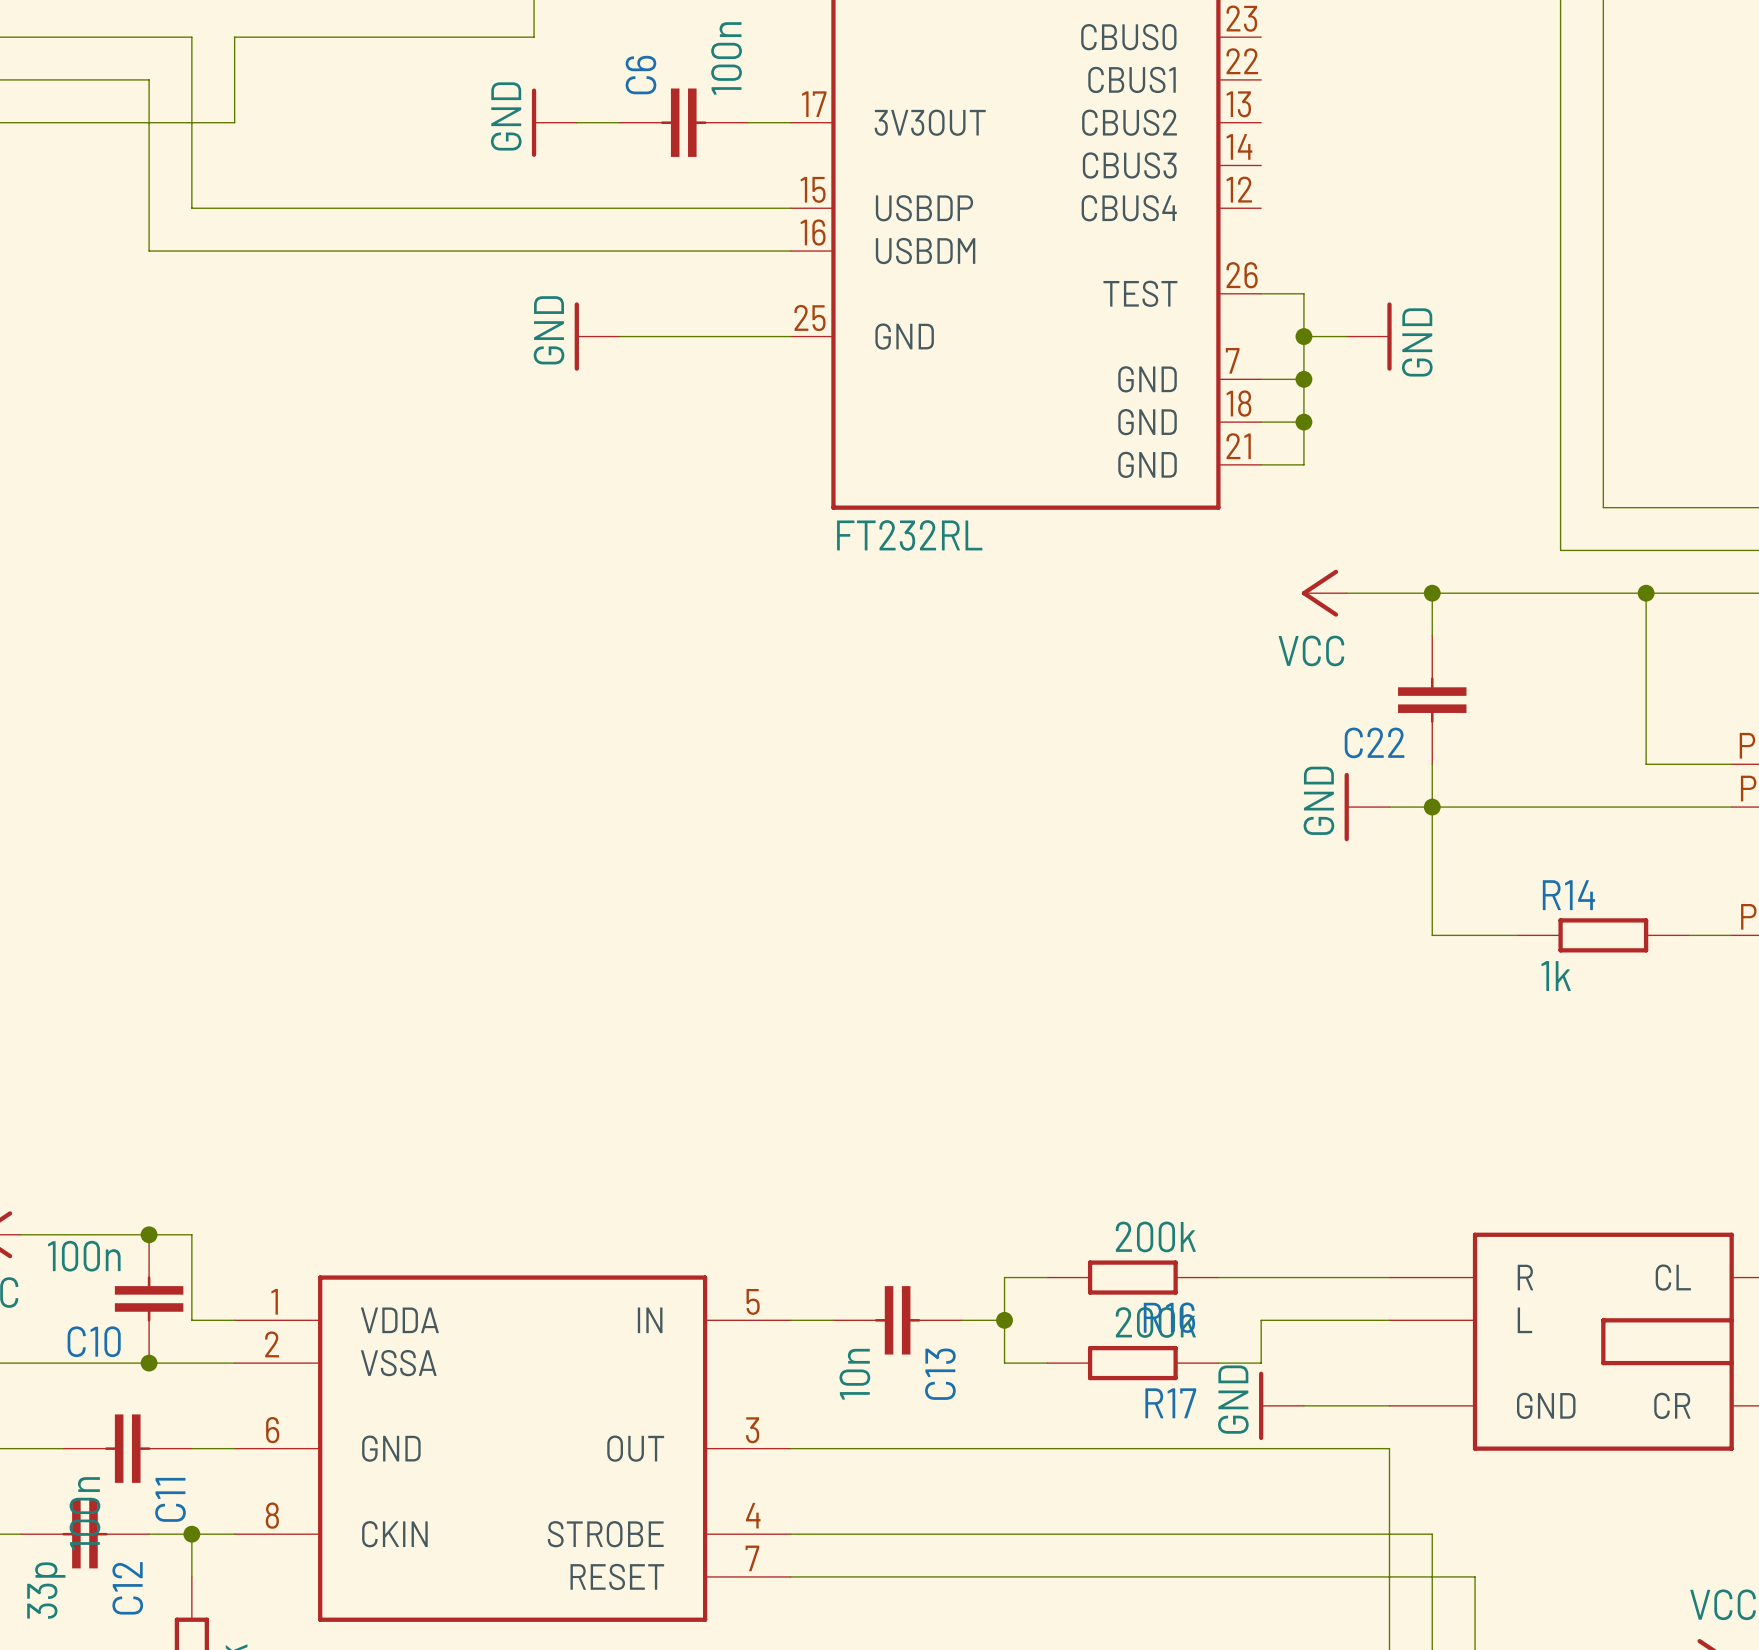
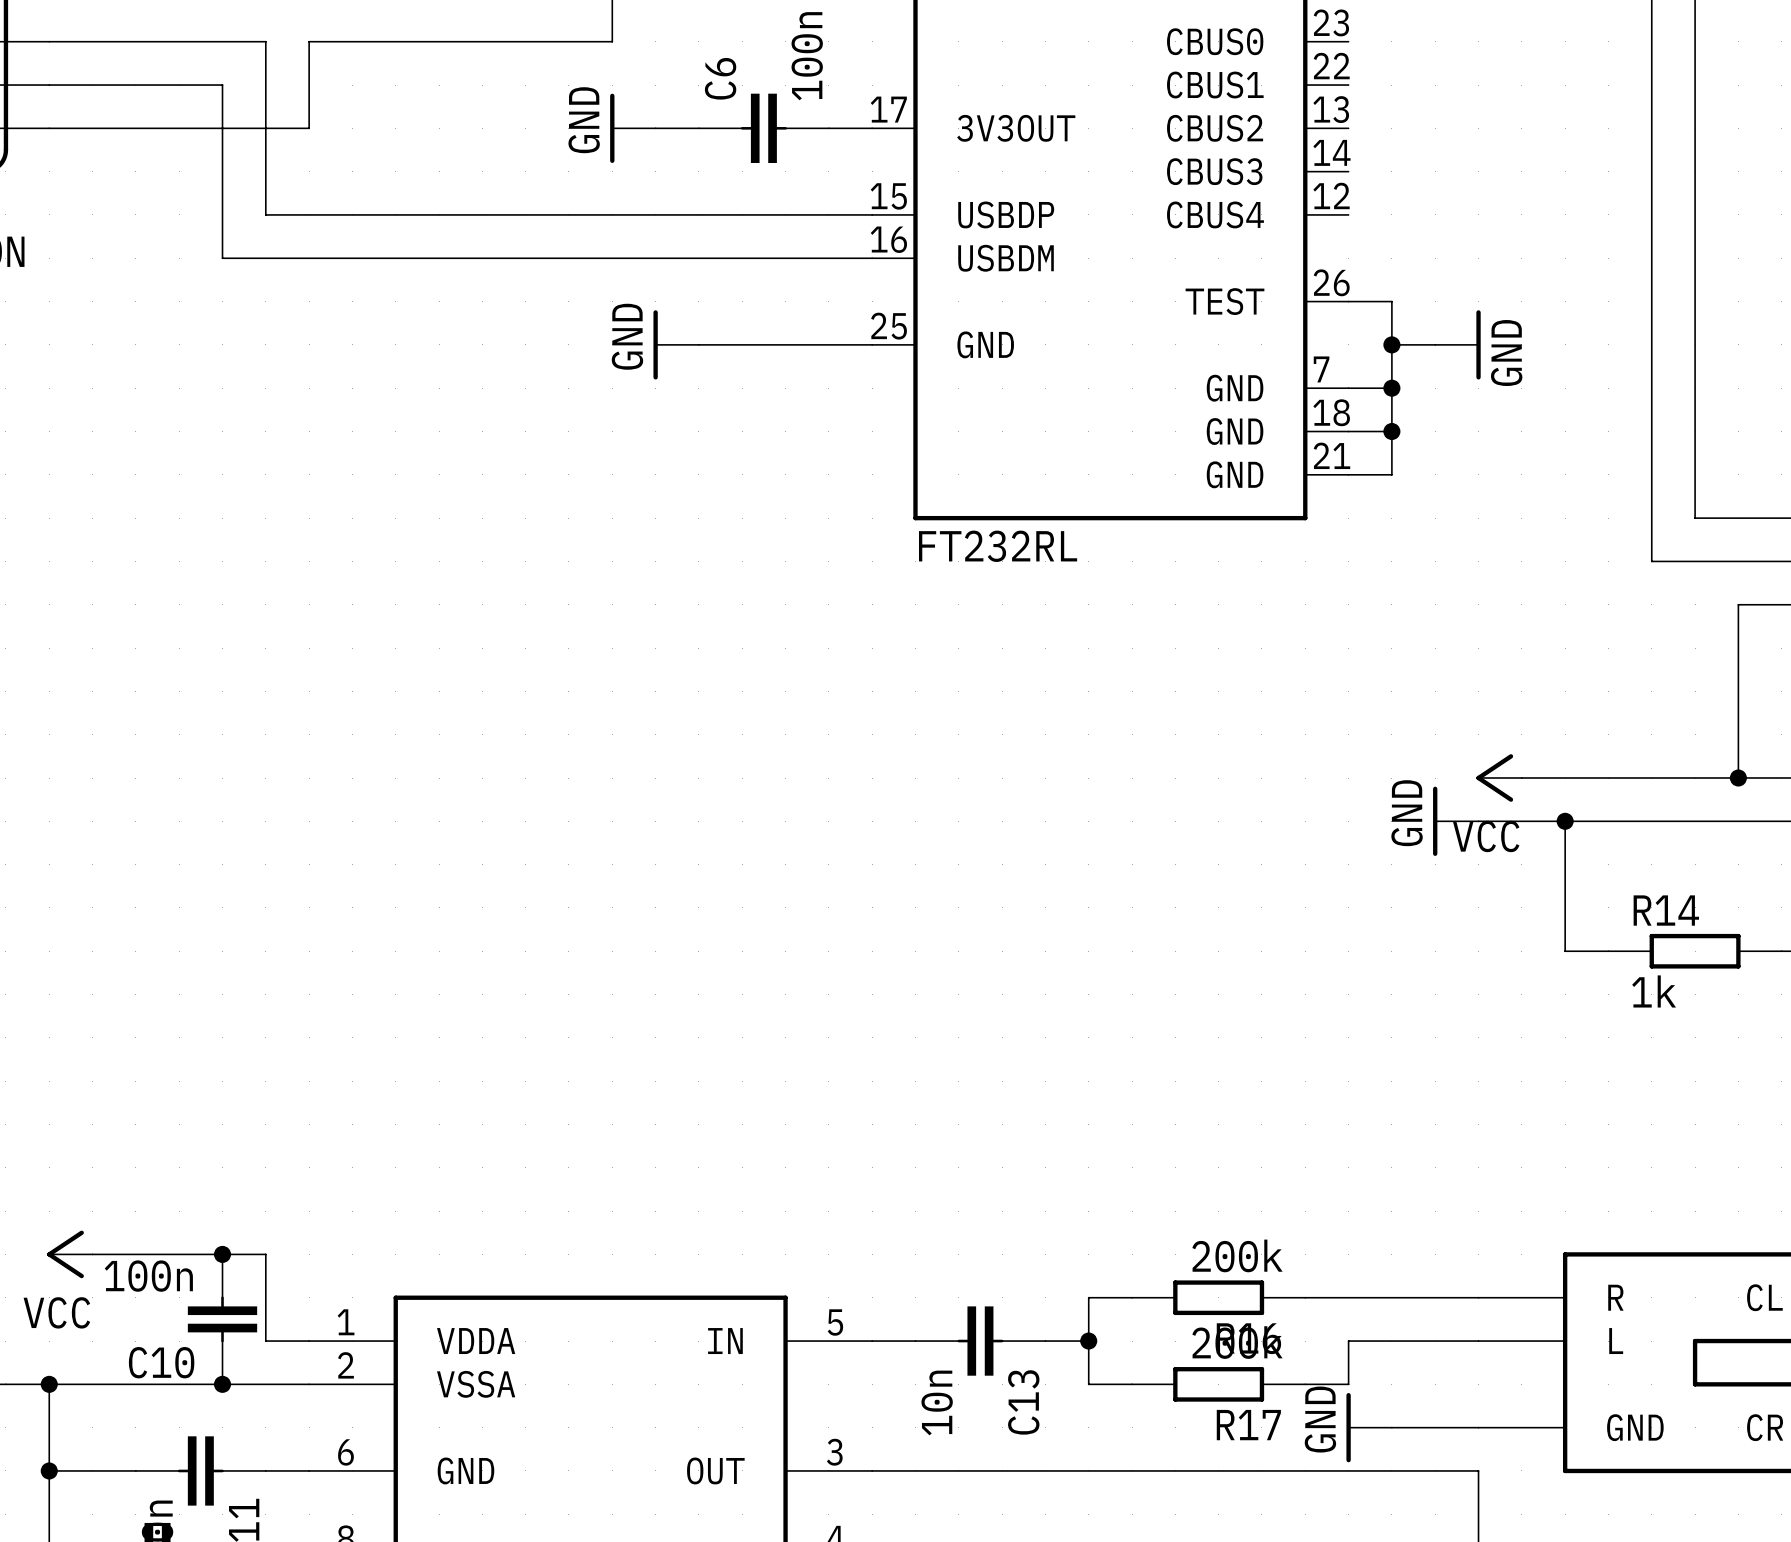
power symbol position: VCC (1324, 593) -> VCC (1499, 778)
wire: (1346, 593) (1646, 593) -> none
wire: (1432, 593) (1432, 635) -> none
junction: (1432, 593) -> none
junction: (1646, 593) -> none
C22: (1432, 700) -> none
wire: (1432, 764) (1432, 935) (1475, 935) -> (1565, 821) (1565, 951)
wire: none -> (1521, 778) (1738, 778)
junction: none -> (1738, 778)
junction position: (1432, 807) -> (1565, 821)

